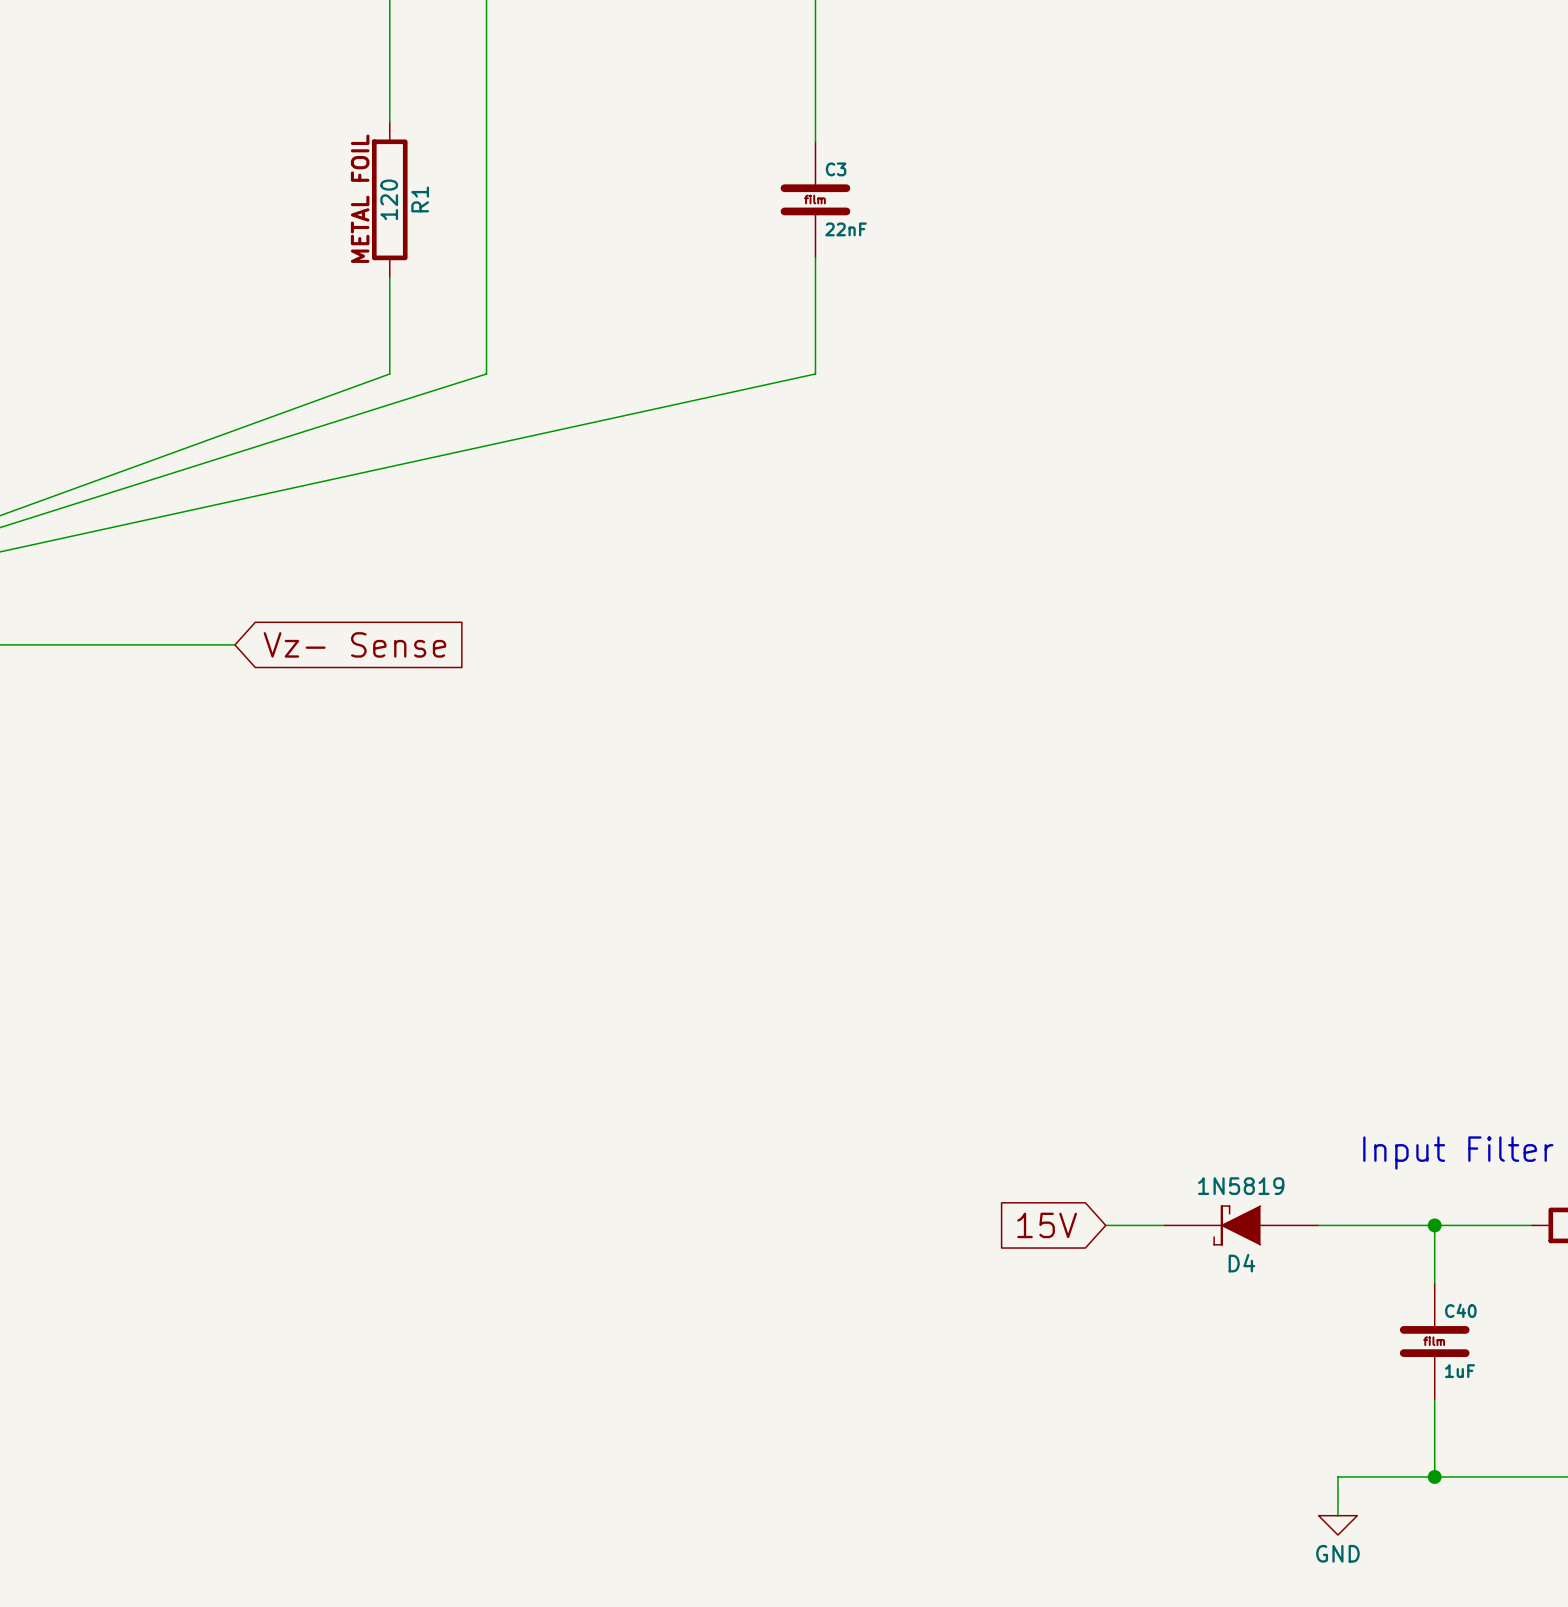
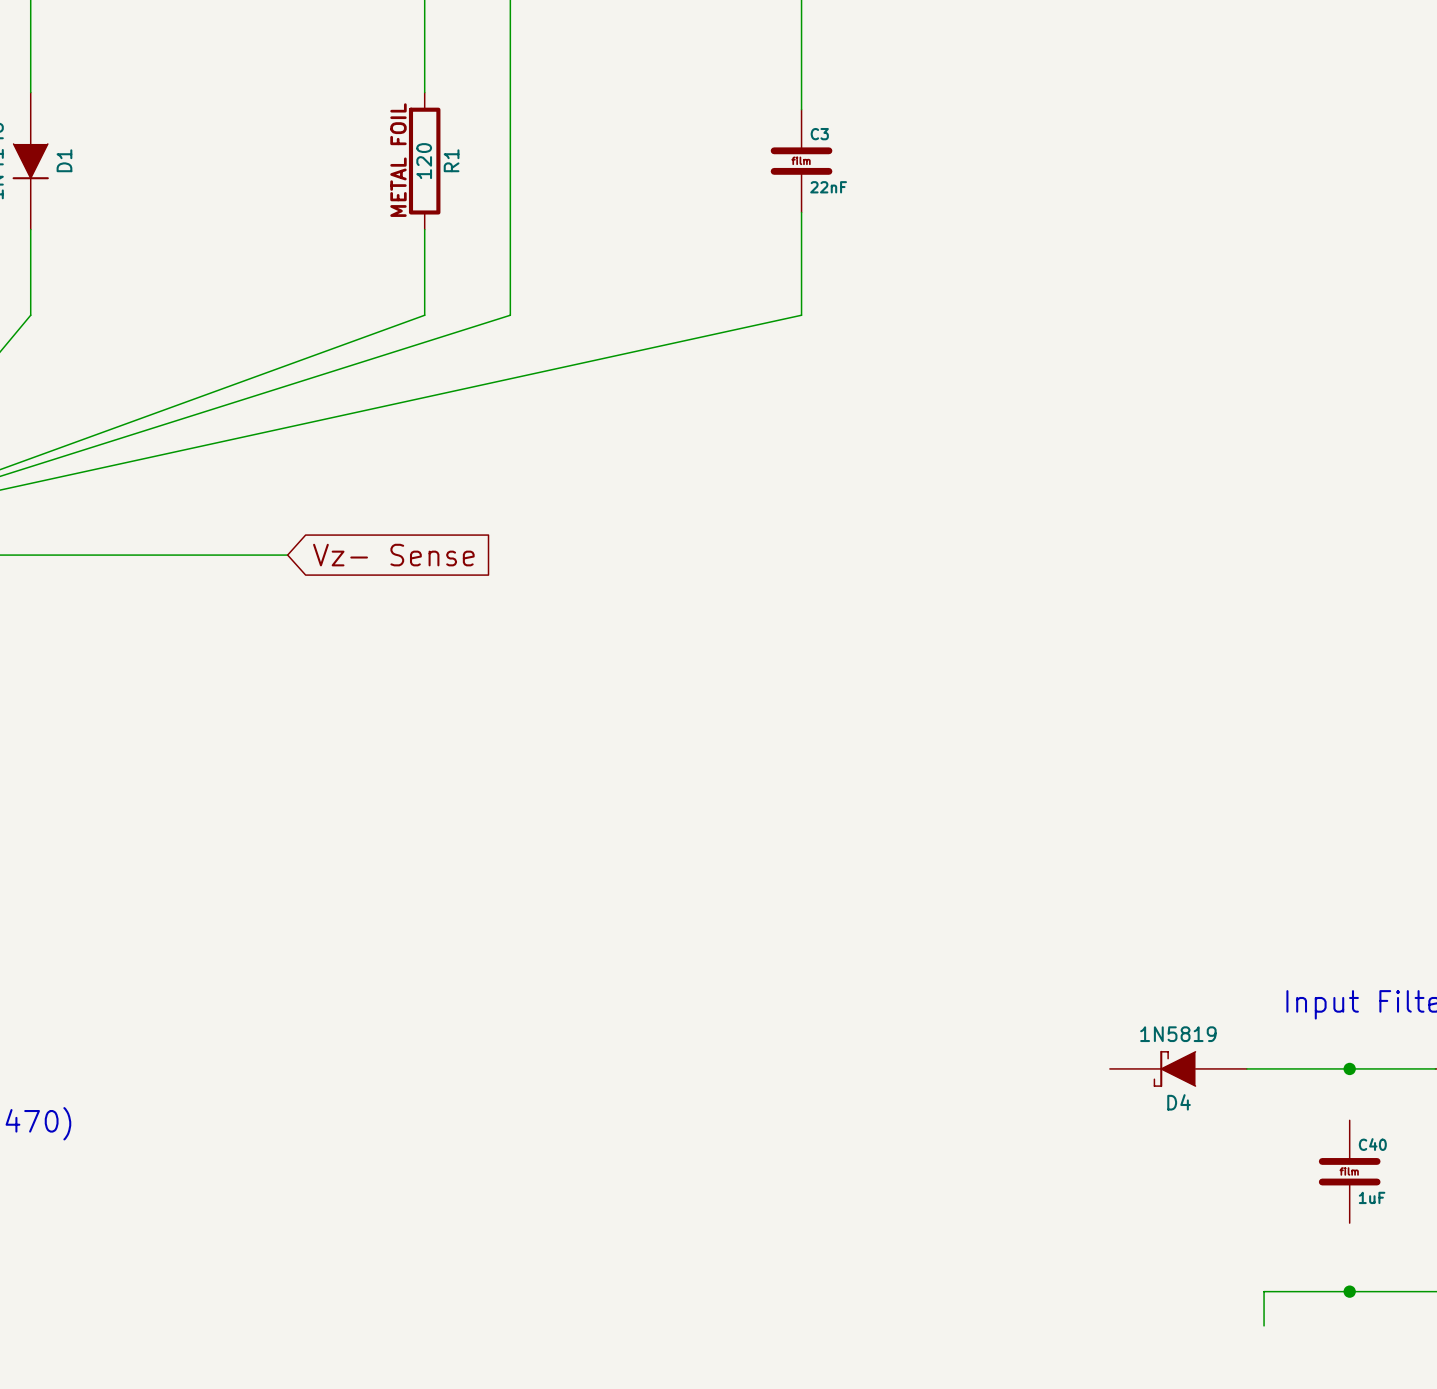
global label: 15V (1047, 1225) -> none
wire: (1105, 1225) (1163, 1225) -> none
wire: (1434, 1225) (1434, 1283) -> none
wire: (1434, 1399) (1434, 1476) -> none
power symbol: GND (1337, 1525) -> none

